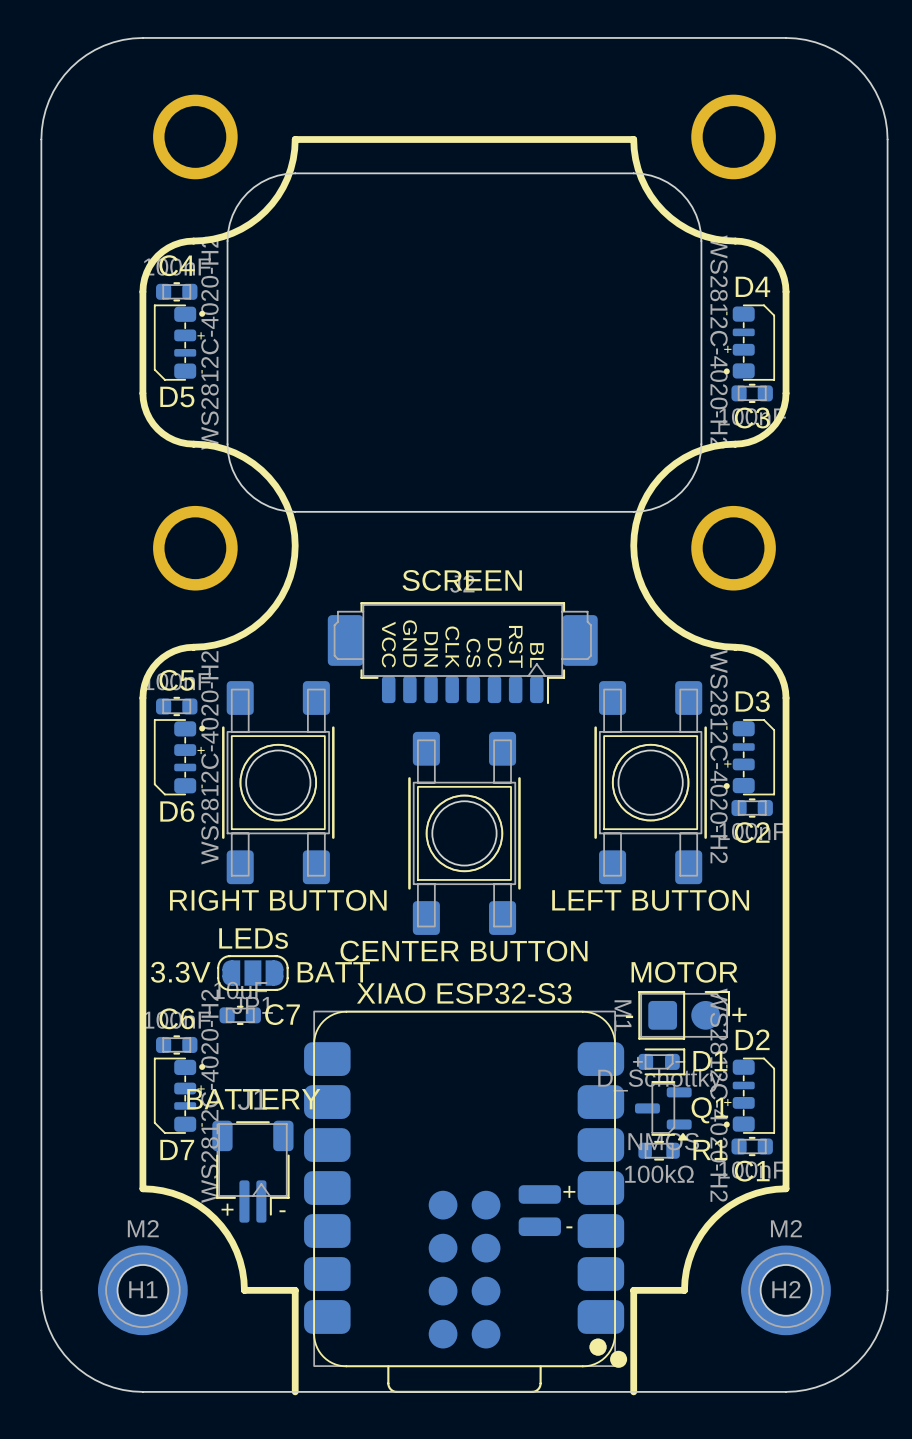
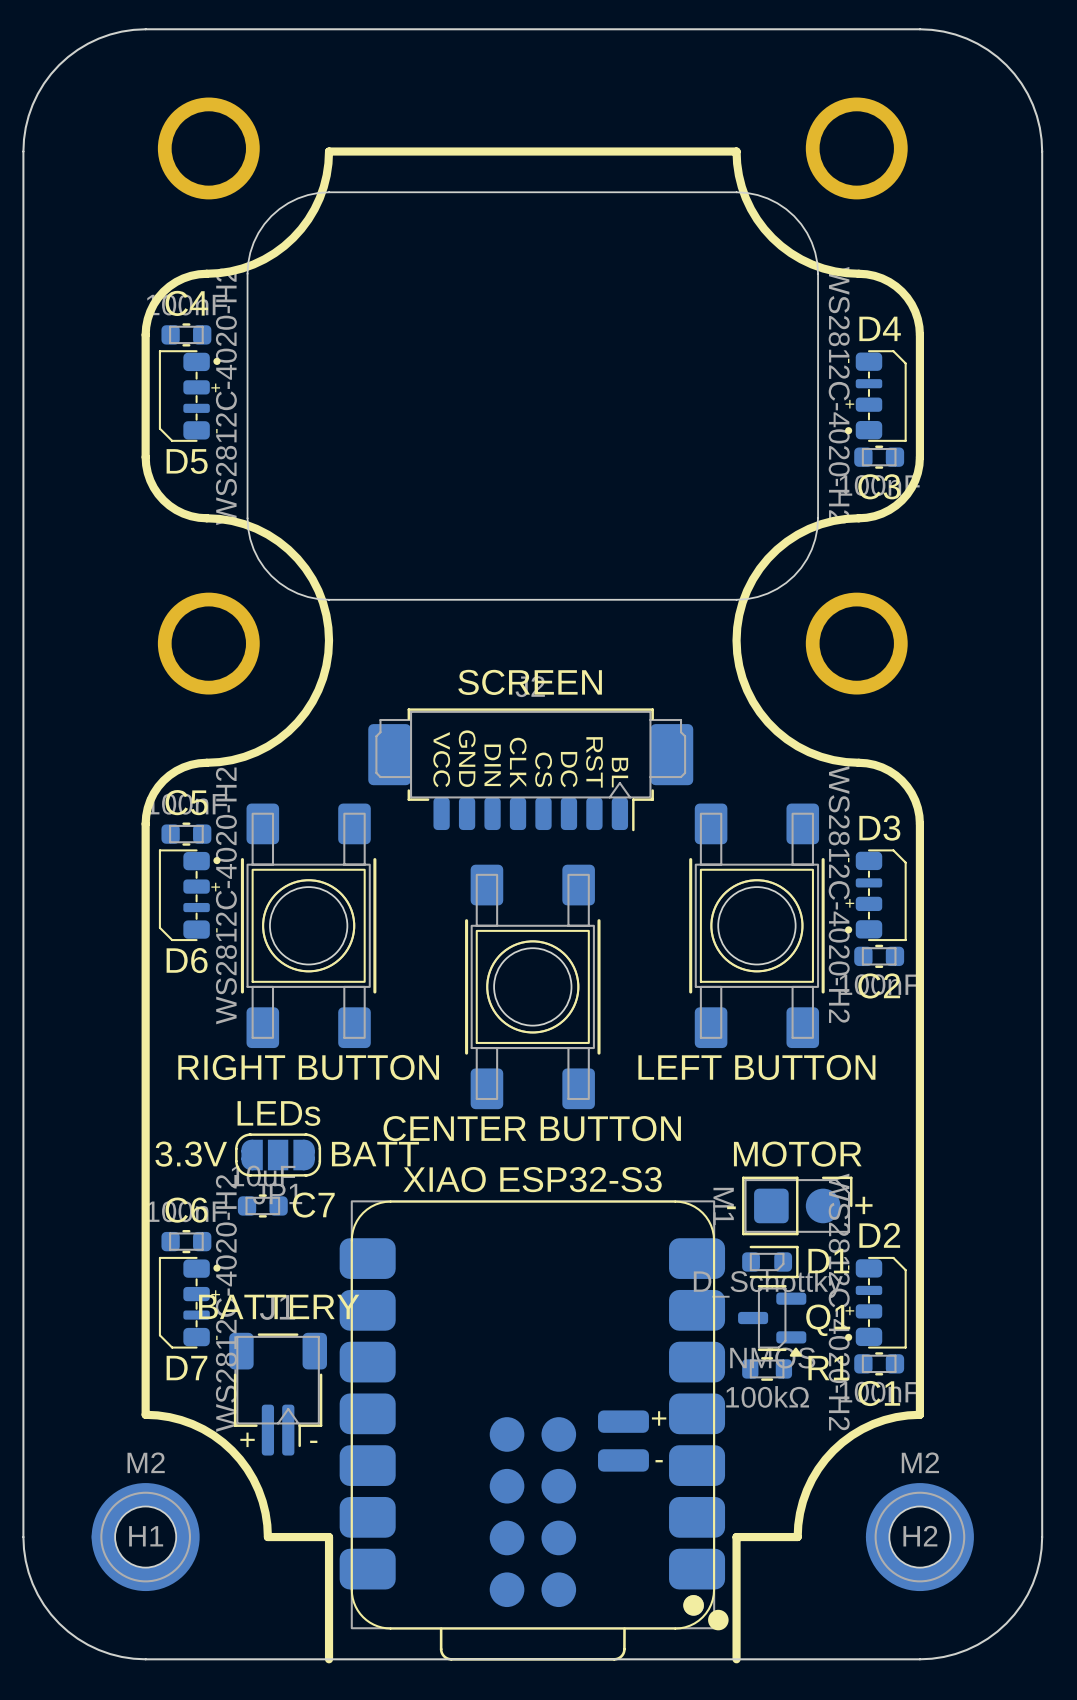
line: (637, 1057) (637, 1066) -> none
line: (642, 1061) (633, 1061) -> none
line: (684, 1061) (676, 1061) -> none

